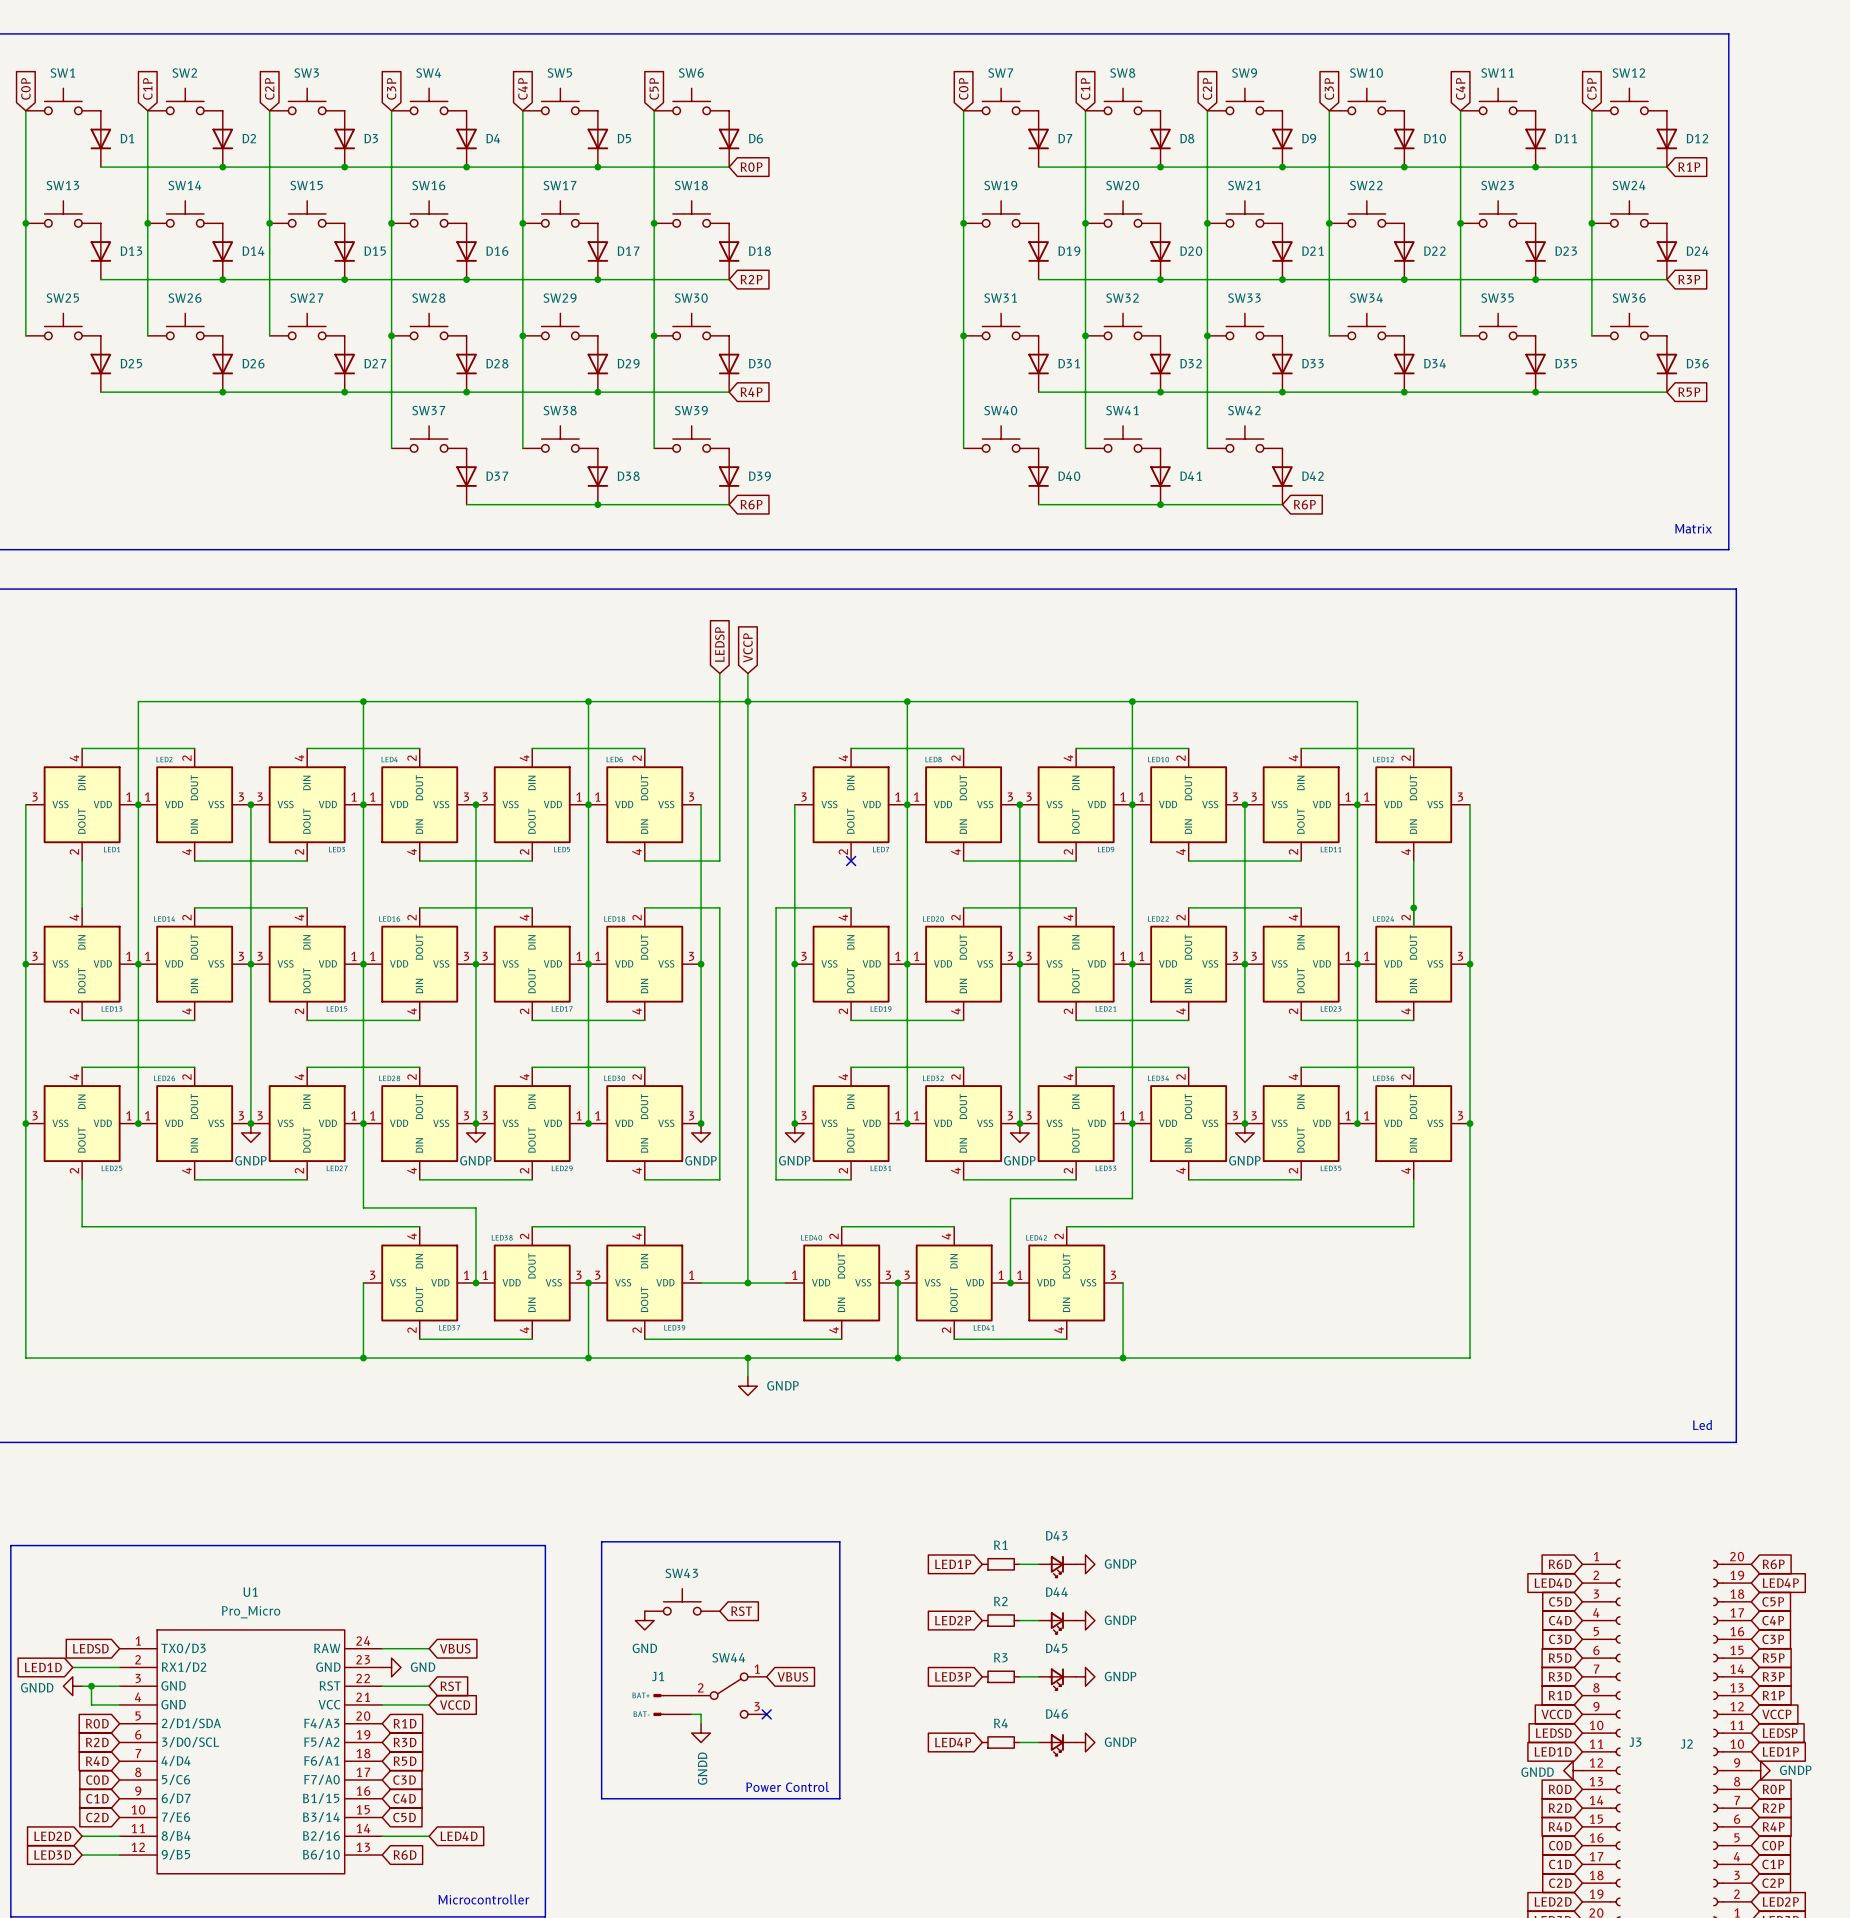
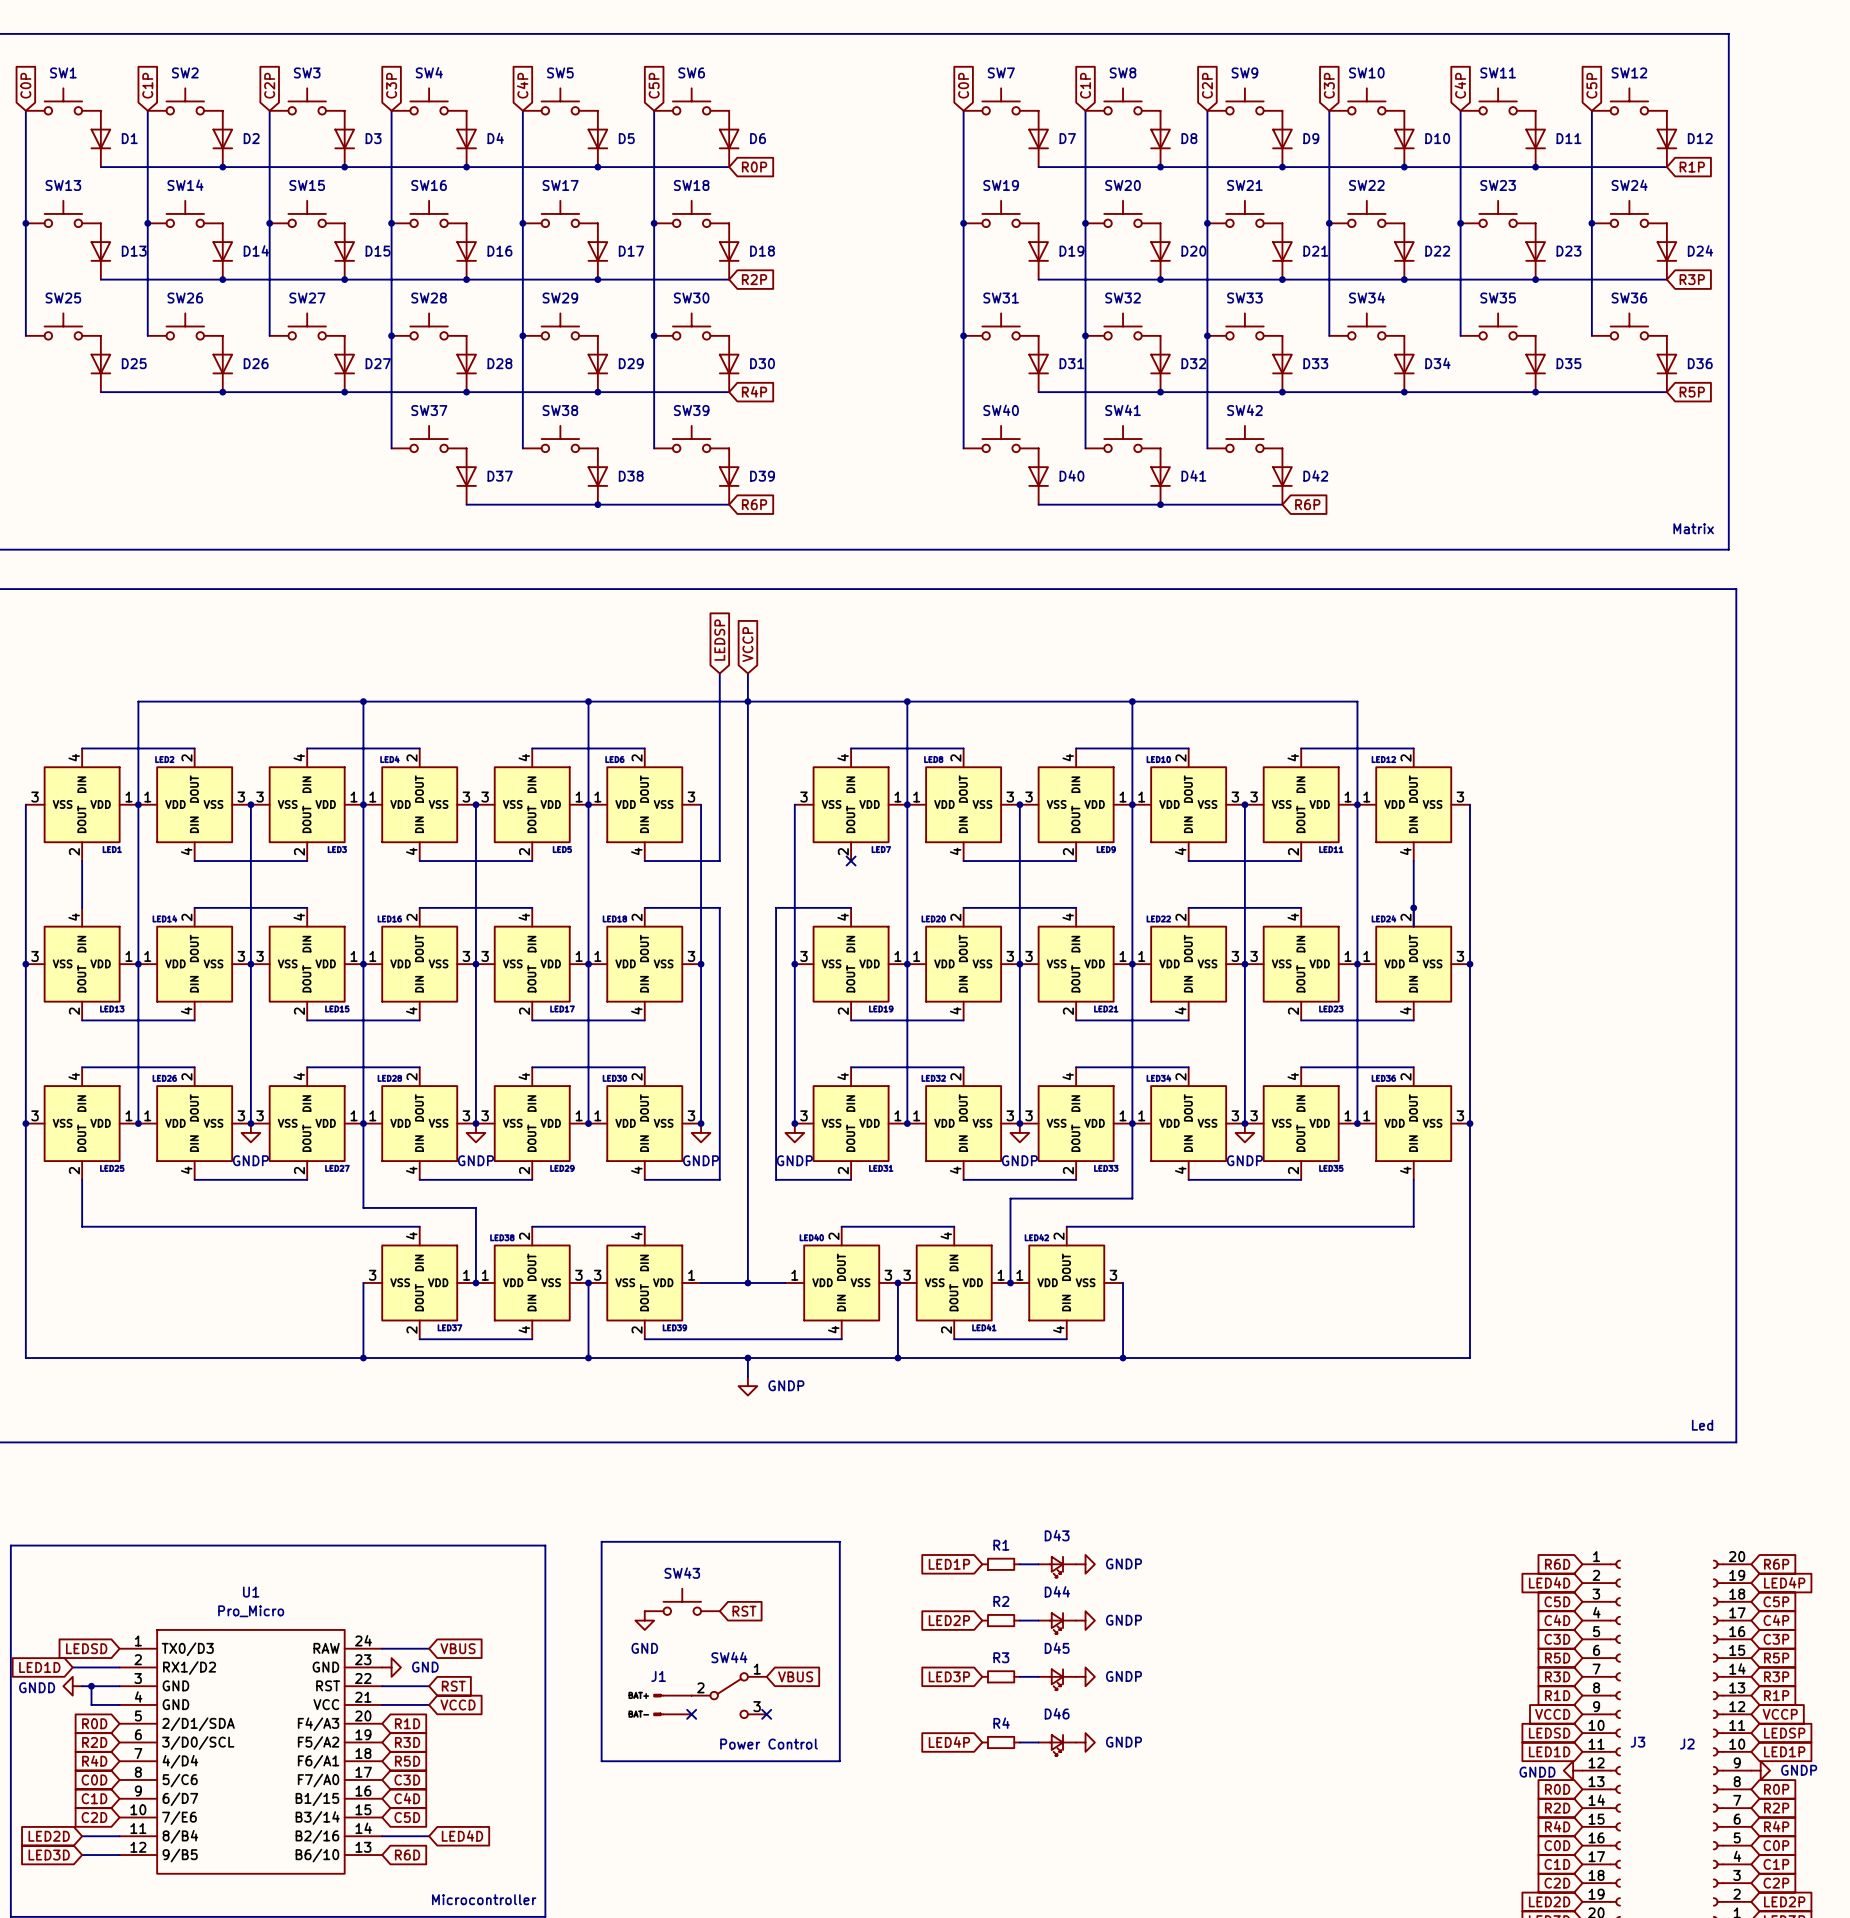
wire: (691, 1714) (701, 1714) (701, 1723) -> none
no-connect mark: none -> (691, 1714)
power symbol: GNDD (701, 1733) -> none
line: (601, 1761) (601, 1798) (839, 1798) (839, 1761) -> (601, 1761) (839, 1761)
text position: Power Control (787, 1786) -> Power Control (769, 1744)

